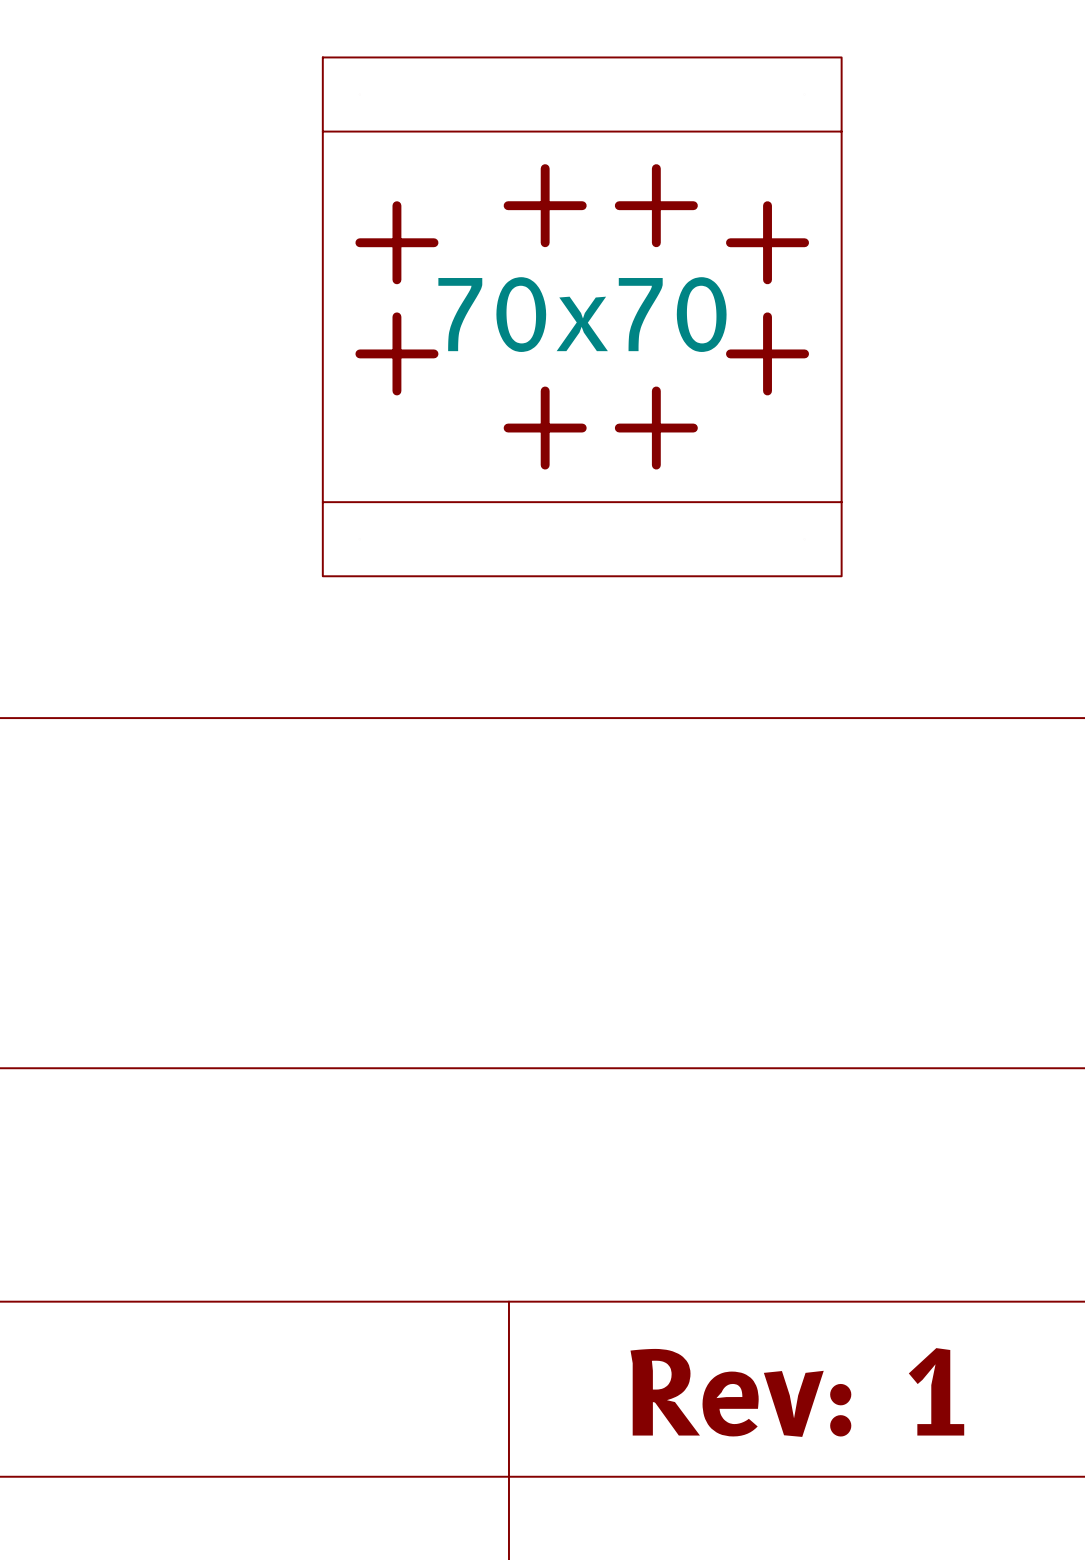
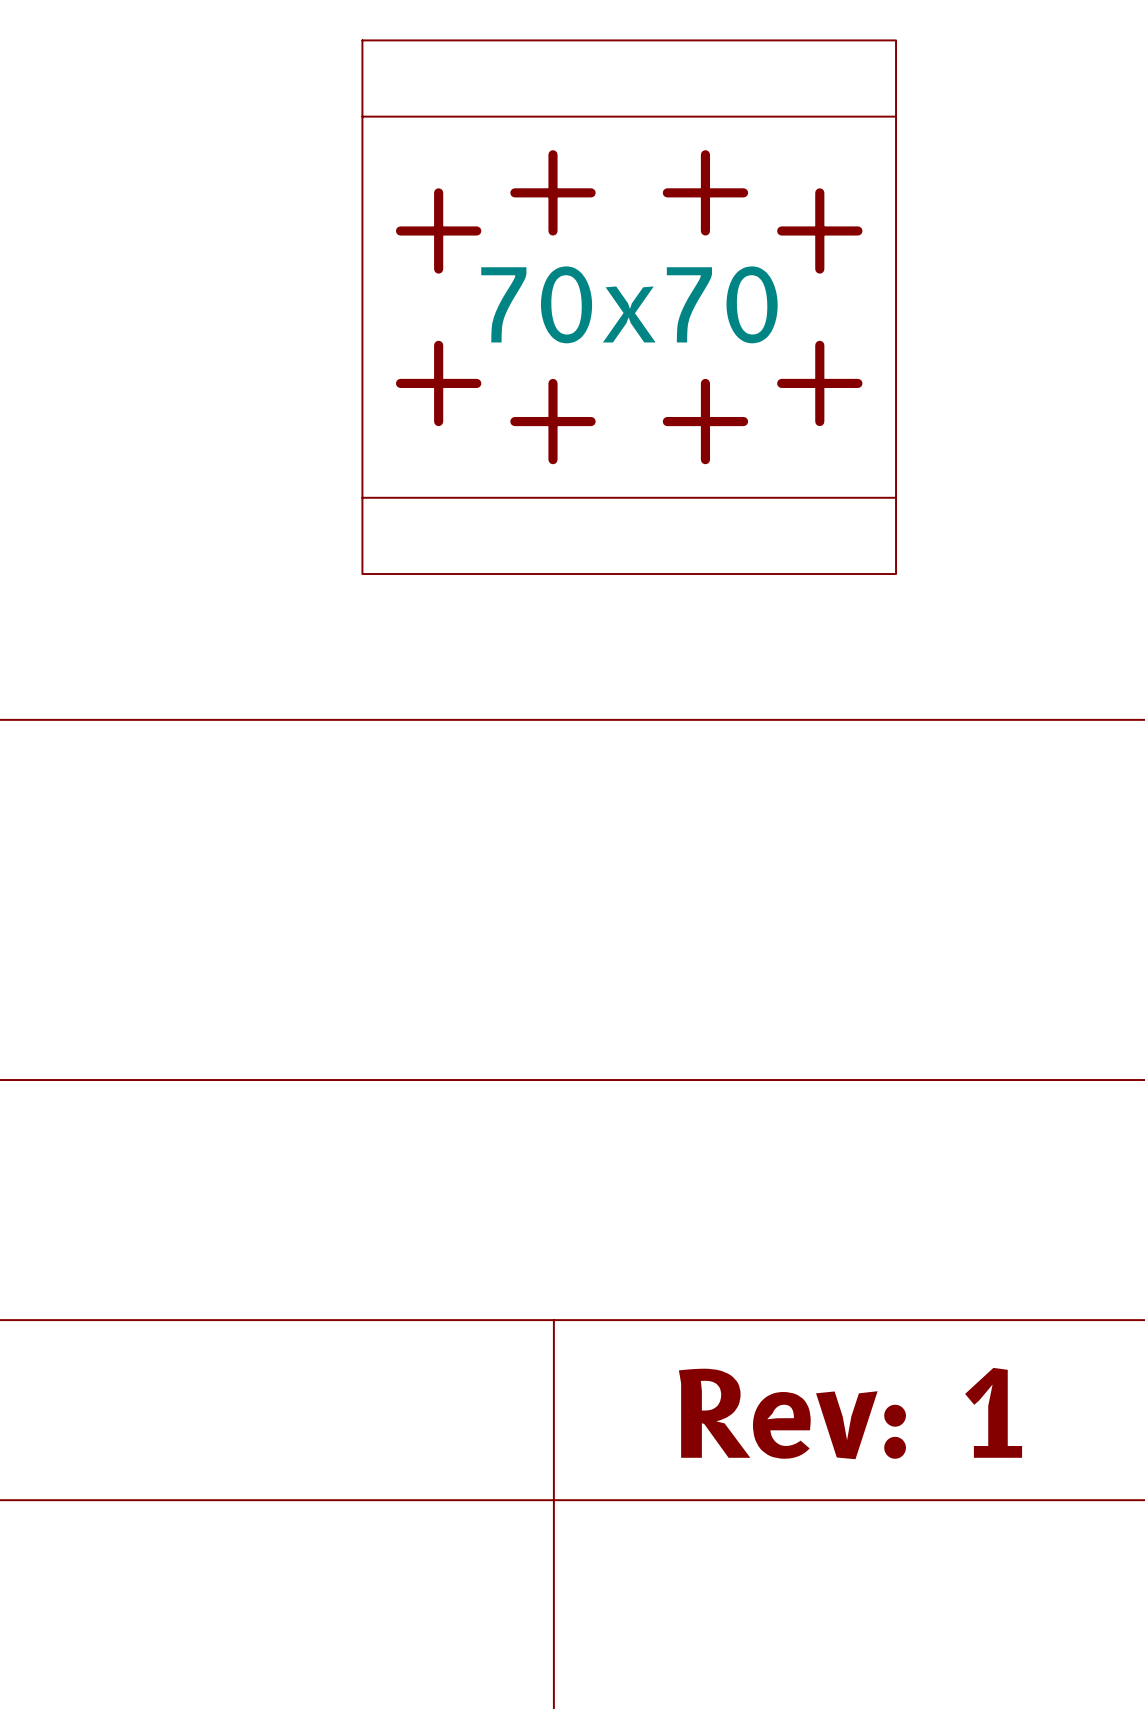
part position: (545, 205) -> (552, 192)
part position: (396, 353) -> (438, 383)
part position: (767, 353) -> (819, 383)
part position: (545, 428) -> (552, 421)

